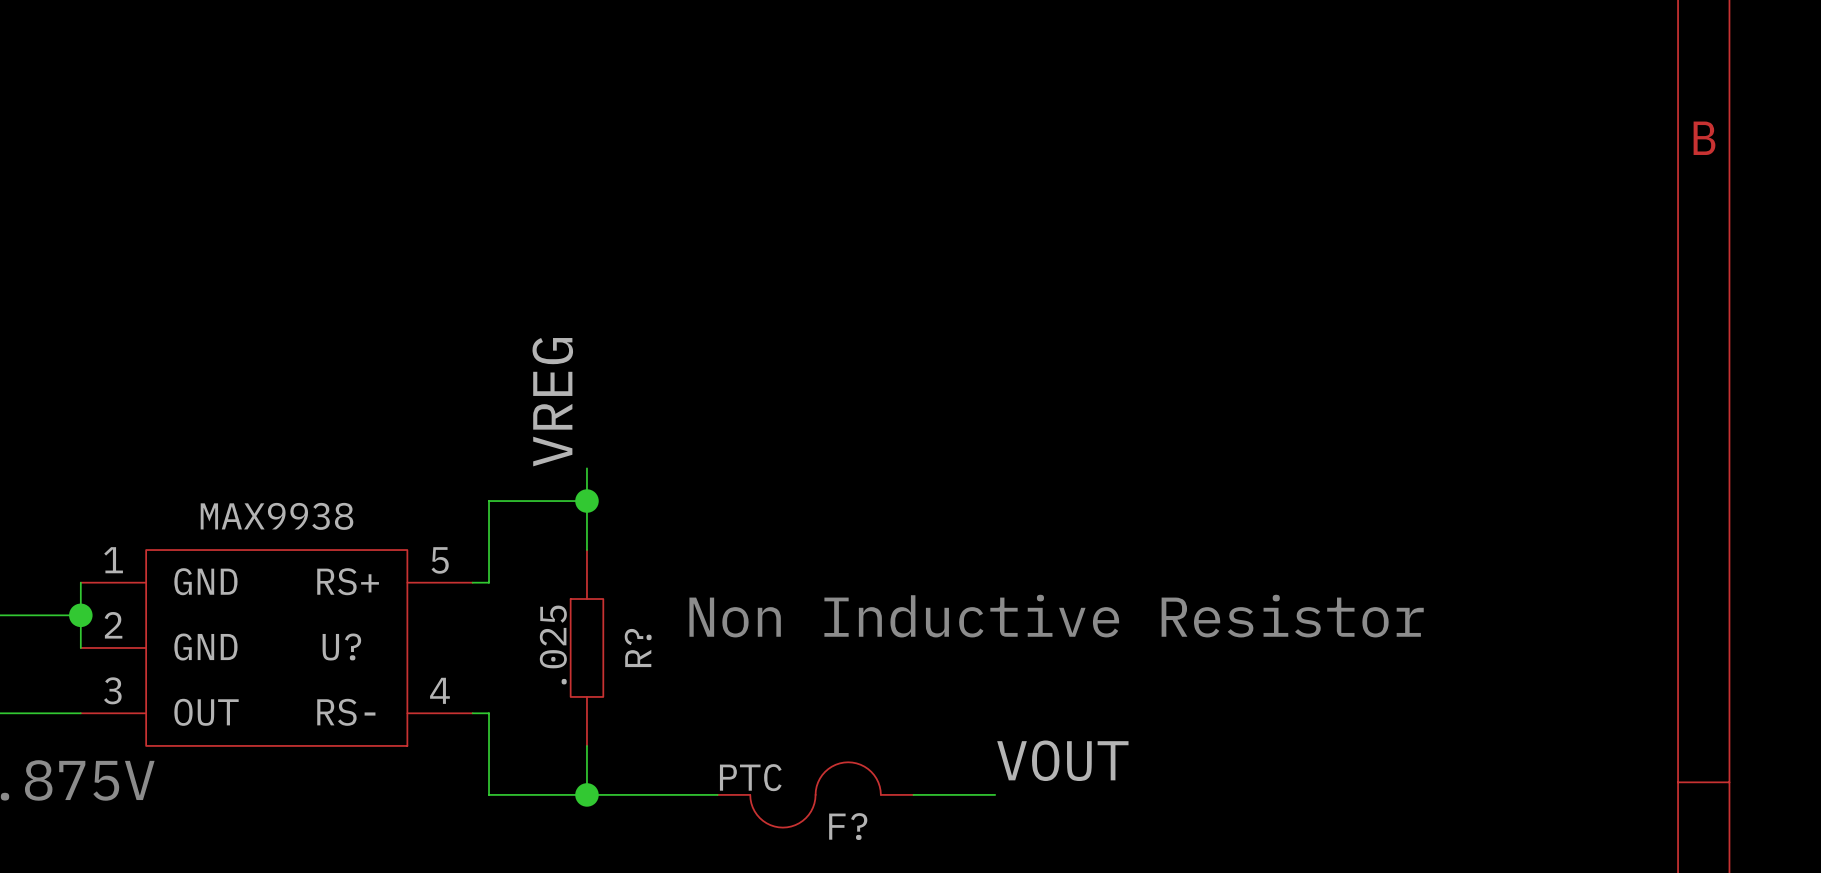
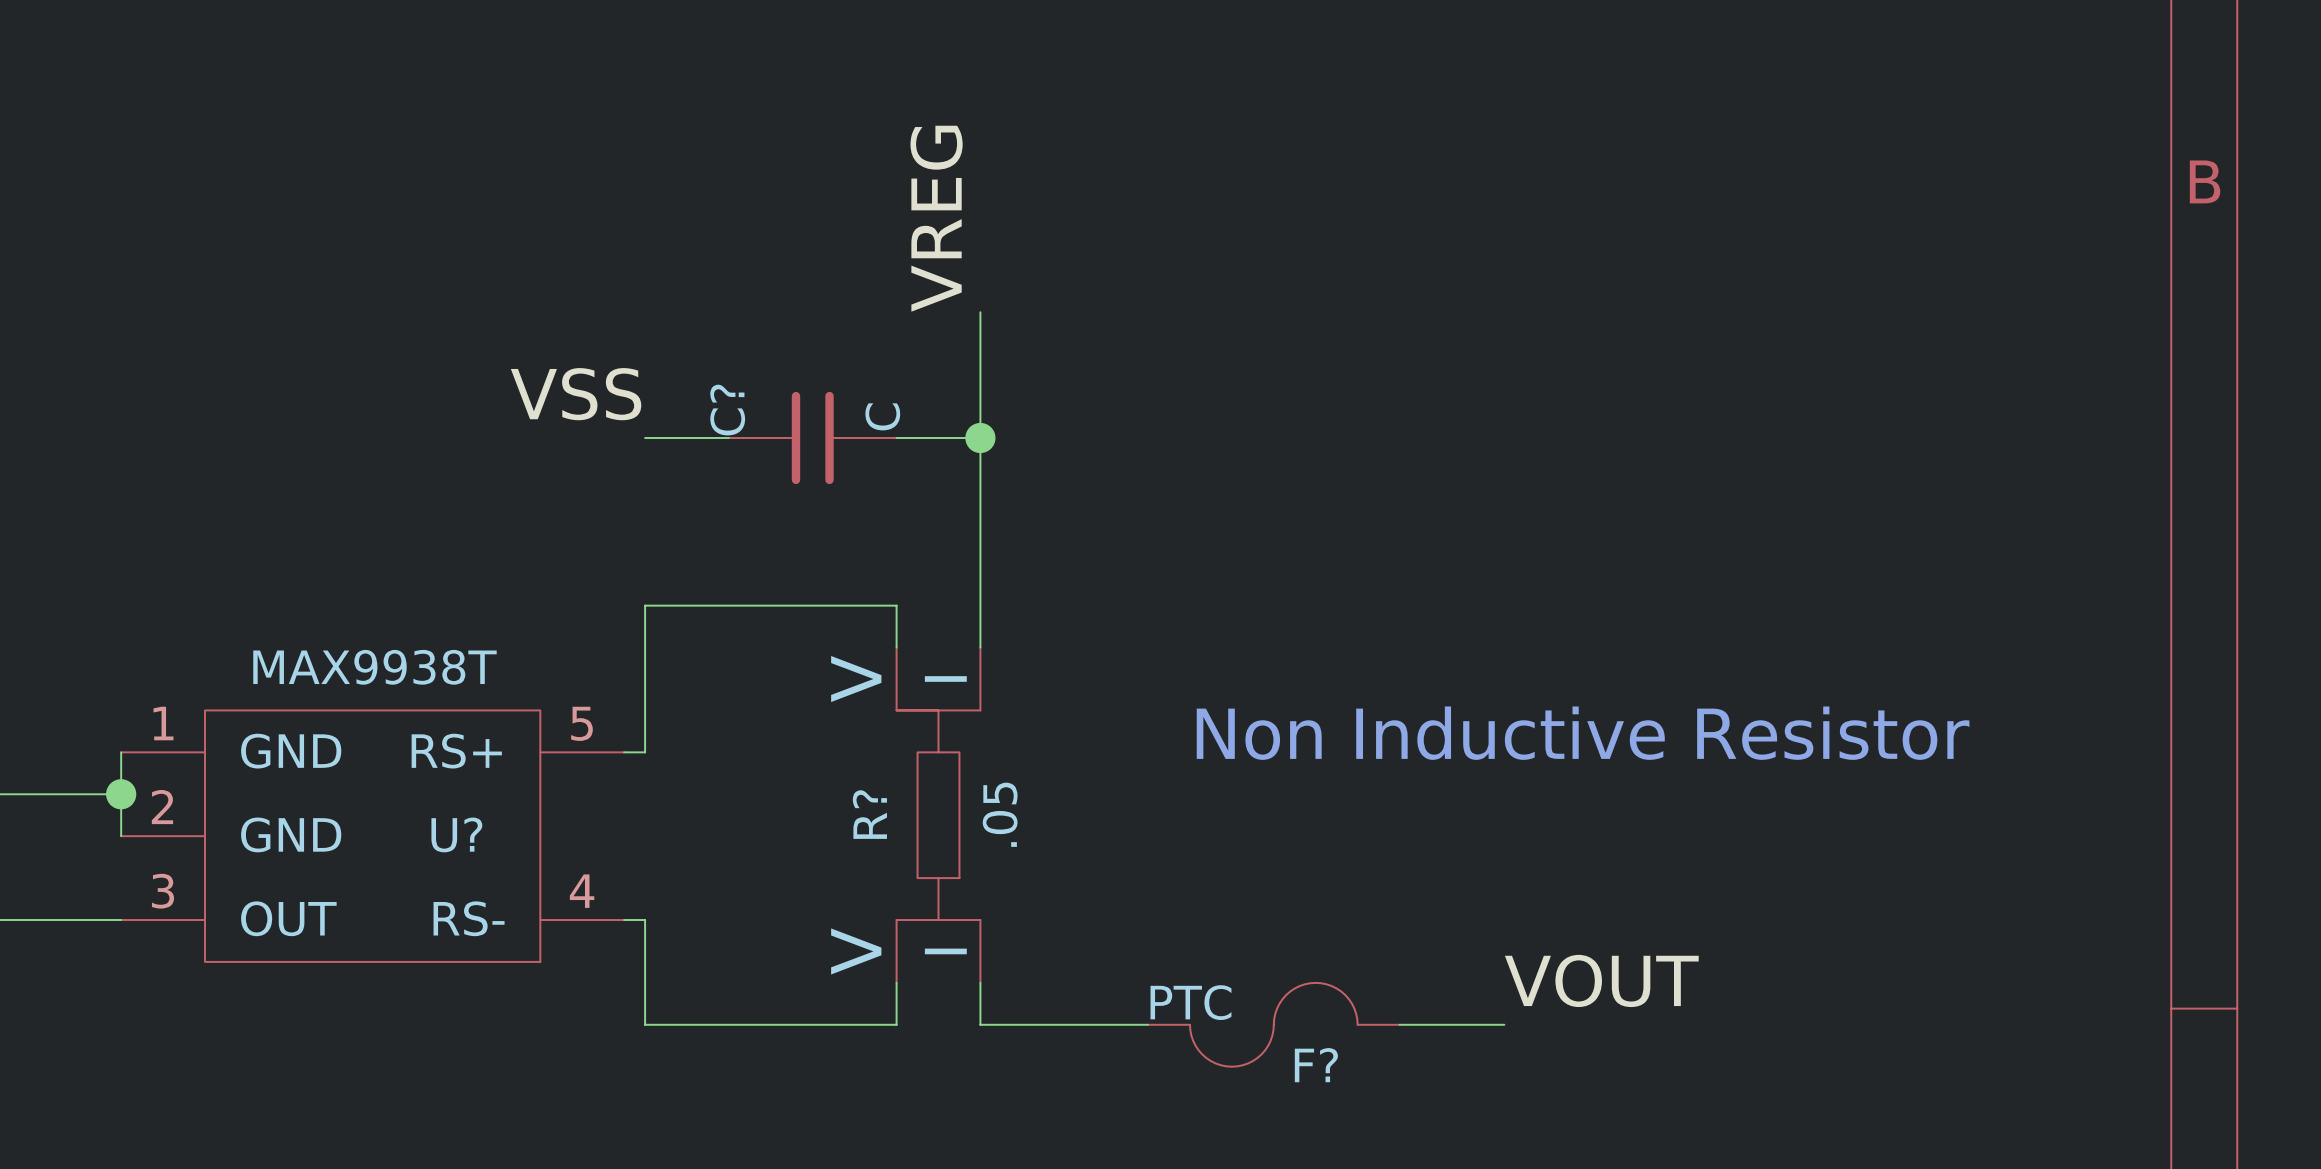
wire: none -> (980, 312) (980, 647)
label: none -> VSS (576, 394)
wire: none -> (645, 437) (728, 437)
C?: none -> C (812, 437)
wire: none -> (896, 437) (980, 437)
junction: none -> (980, 437)
label position: VREG (552, 402) -> VREG (936, 218)
wire: (586, 468) (586, 550) -> none
wire: (489, 501) (586, 501) -> (645, 647) (645, 605) (896, 605) (896, 647)
junction: (586, 501) -> none
U? value: MAX9938 (276, 516) -> MAX9938T (374, 667)
text position: Non Inductive Resistor (1056, 616) -> Non Inductive Resistor (1583, 733)
R?: none -> .05 (938, 815)
R?: .025 (586, 647) -> none
wire: (586, 745) (586, 794) -> none
label position: VOUT (1062, 760) -> VOUT (1601, 980)
wire: none -> (980, 982) (980, 1024) (1148, 1024)
junction: (586, 794) -> none
wire: (684, 794) (717, 794) -> (896, 1024) (896, 982)
F? position: (815, 794) -> (1273, 1024)
wire: (913, 794) (995, 794) -> (1399, 1024) (1504, 1024)

